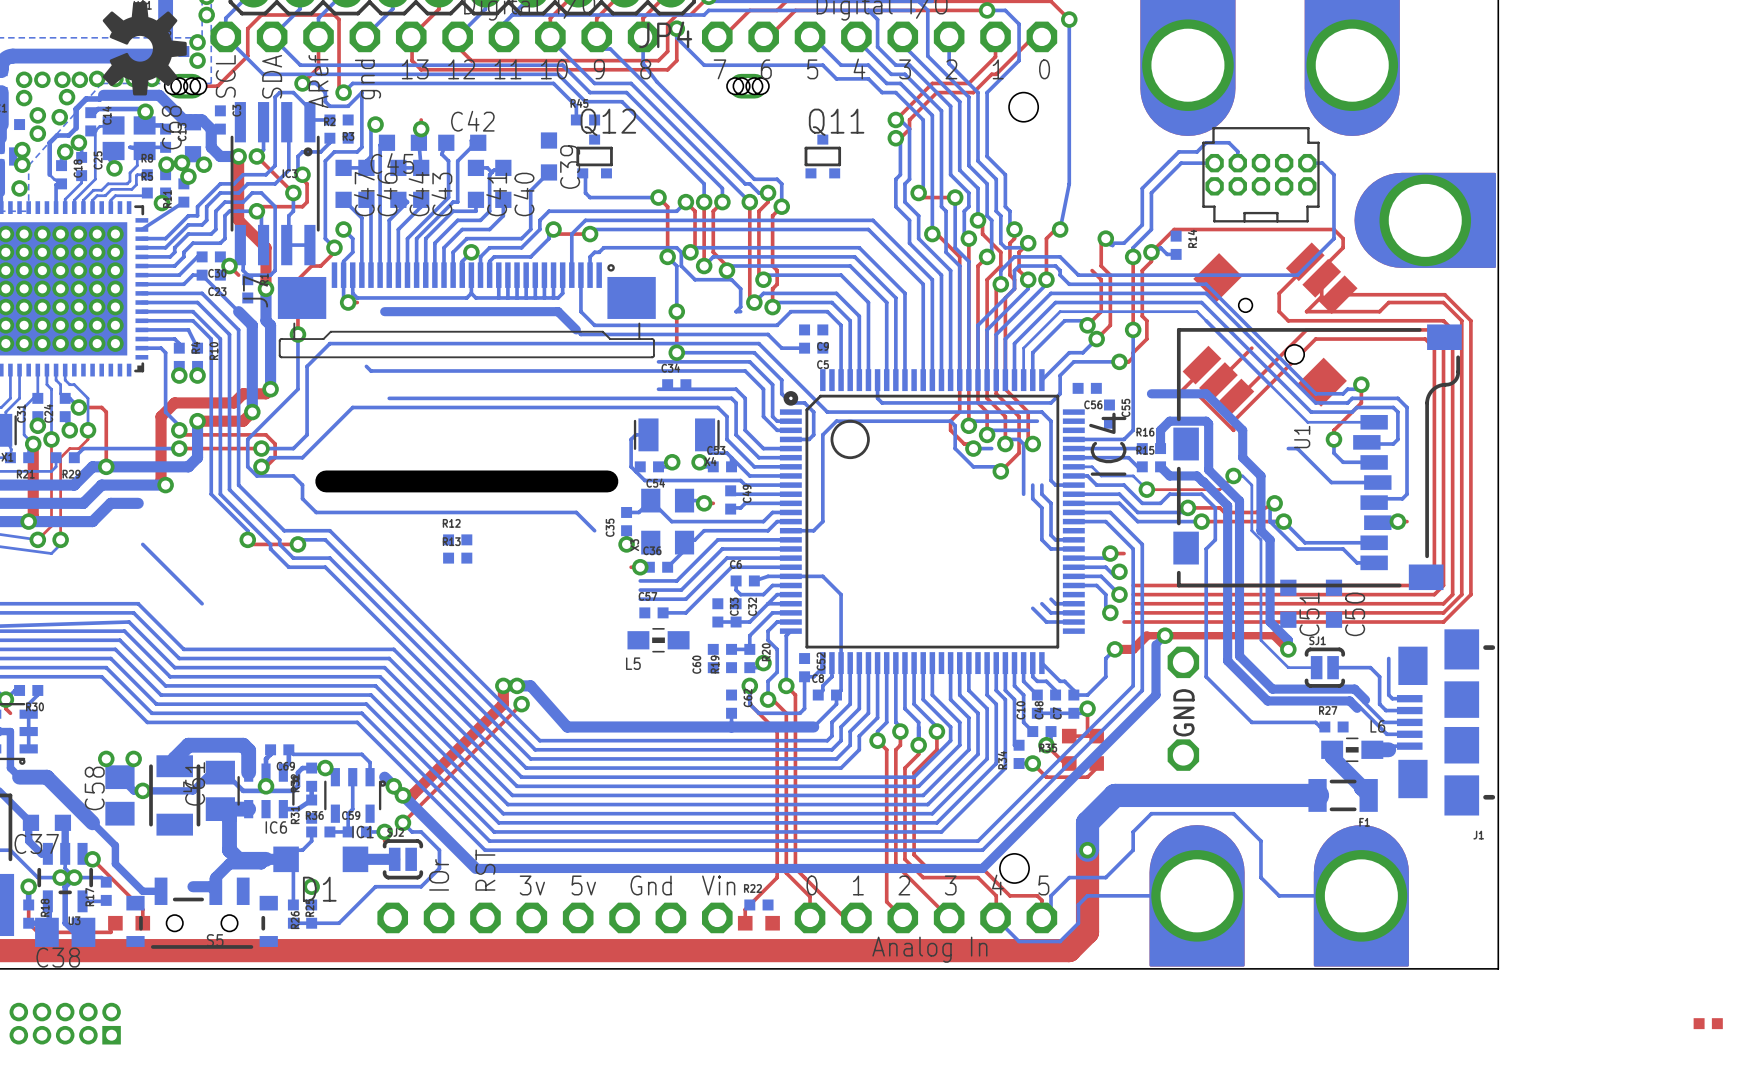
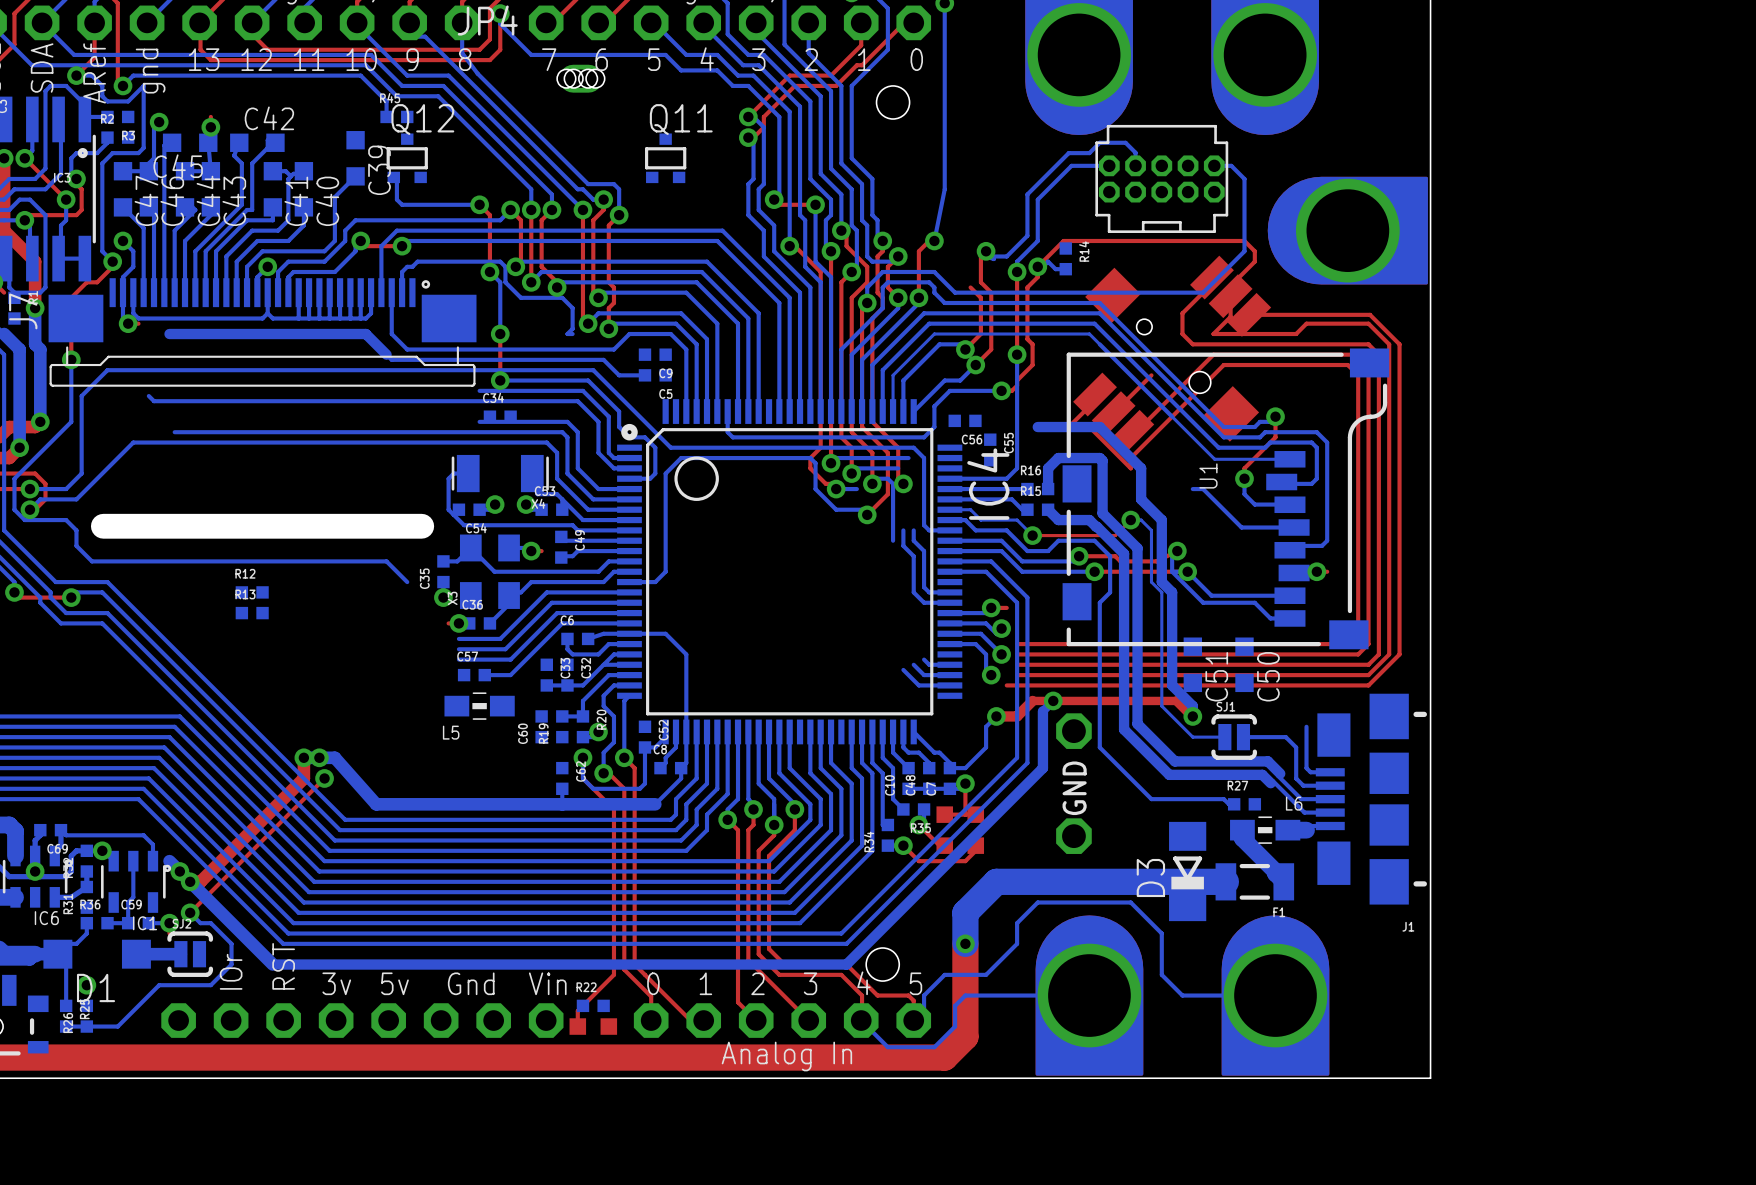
D3: none -> (1187, 871)
part: (1708, 1023) -> none

